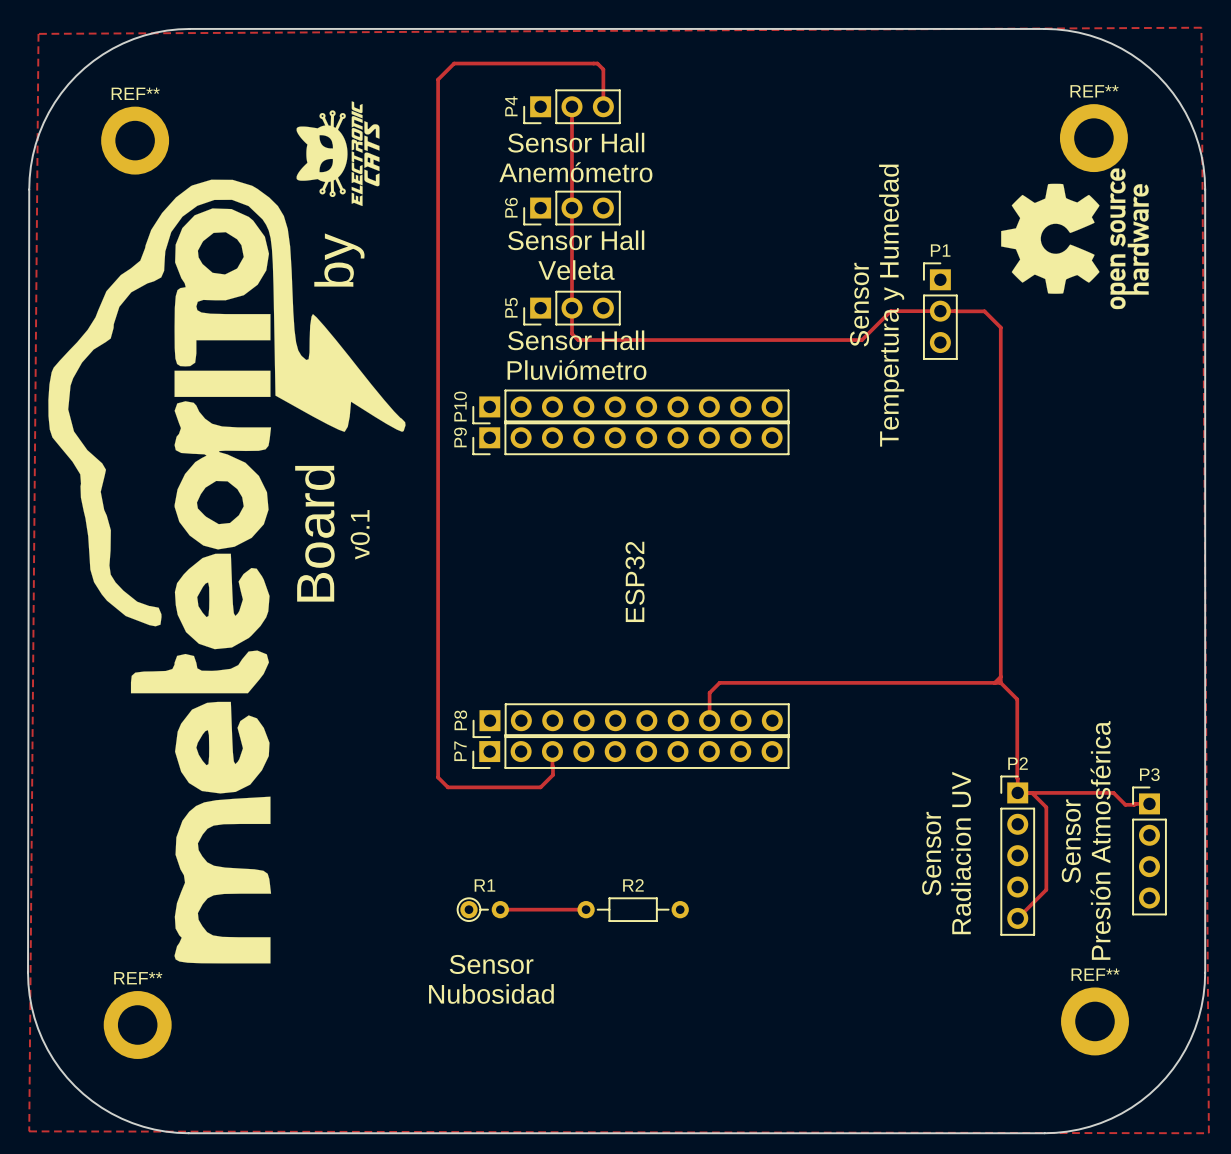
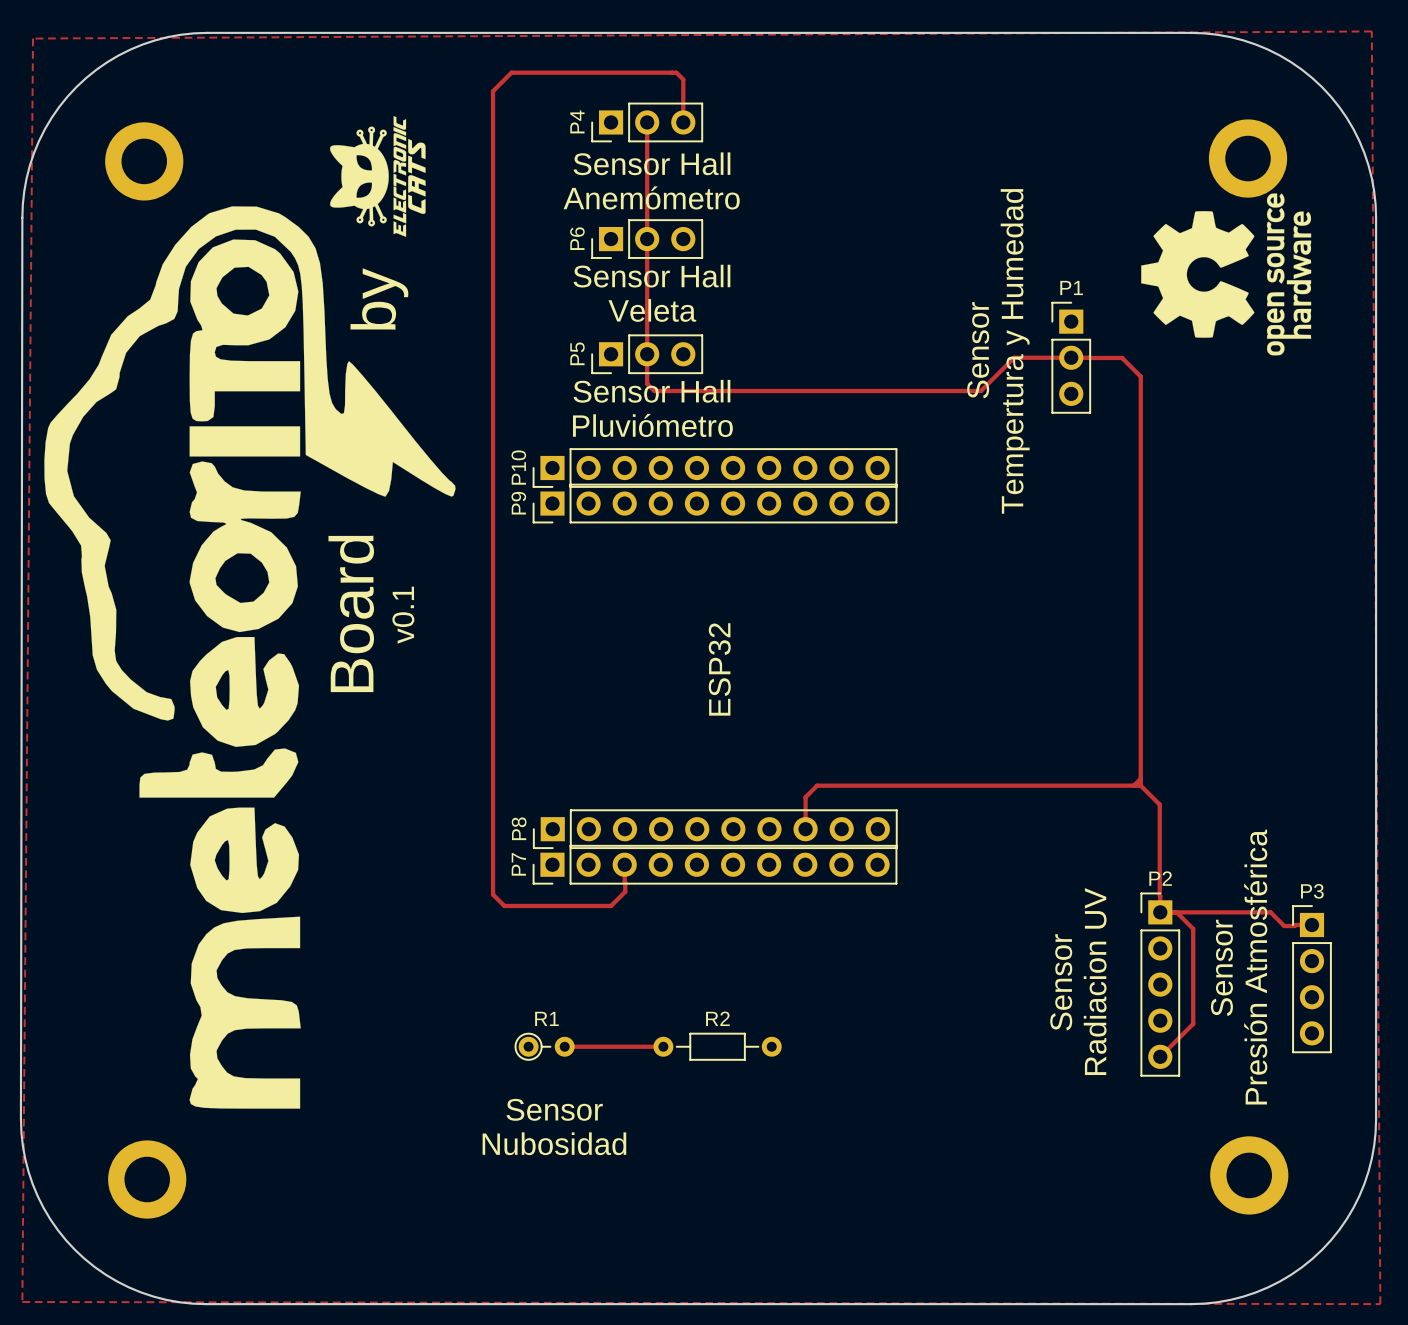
REF** name: REF** (1094, 91) -> none
REF** name: REF** (135, 93) -> none
REF** name: REF** (1095, 974) -> none
REF** name: REF** (138, 978) -> none

